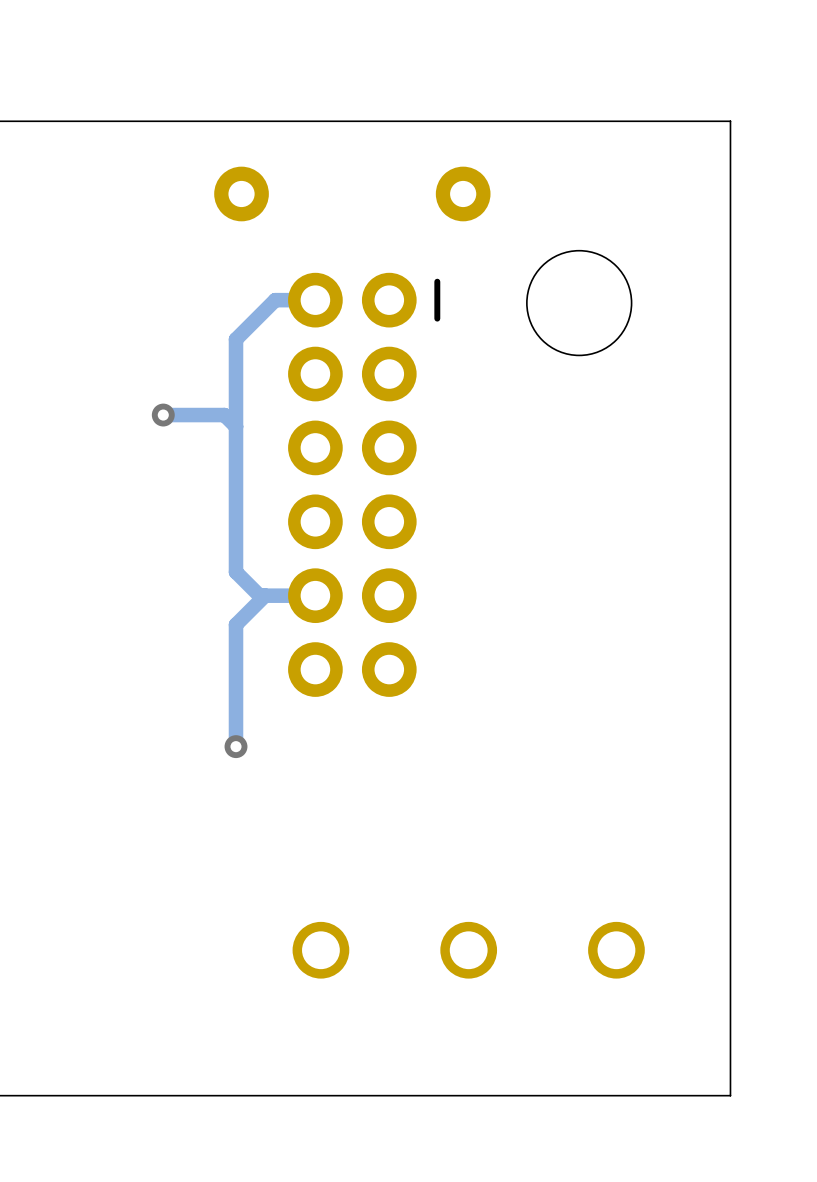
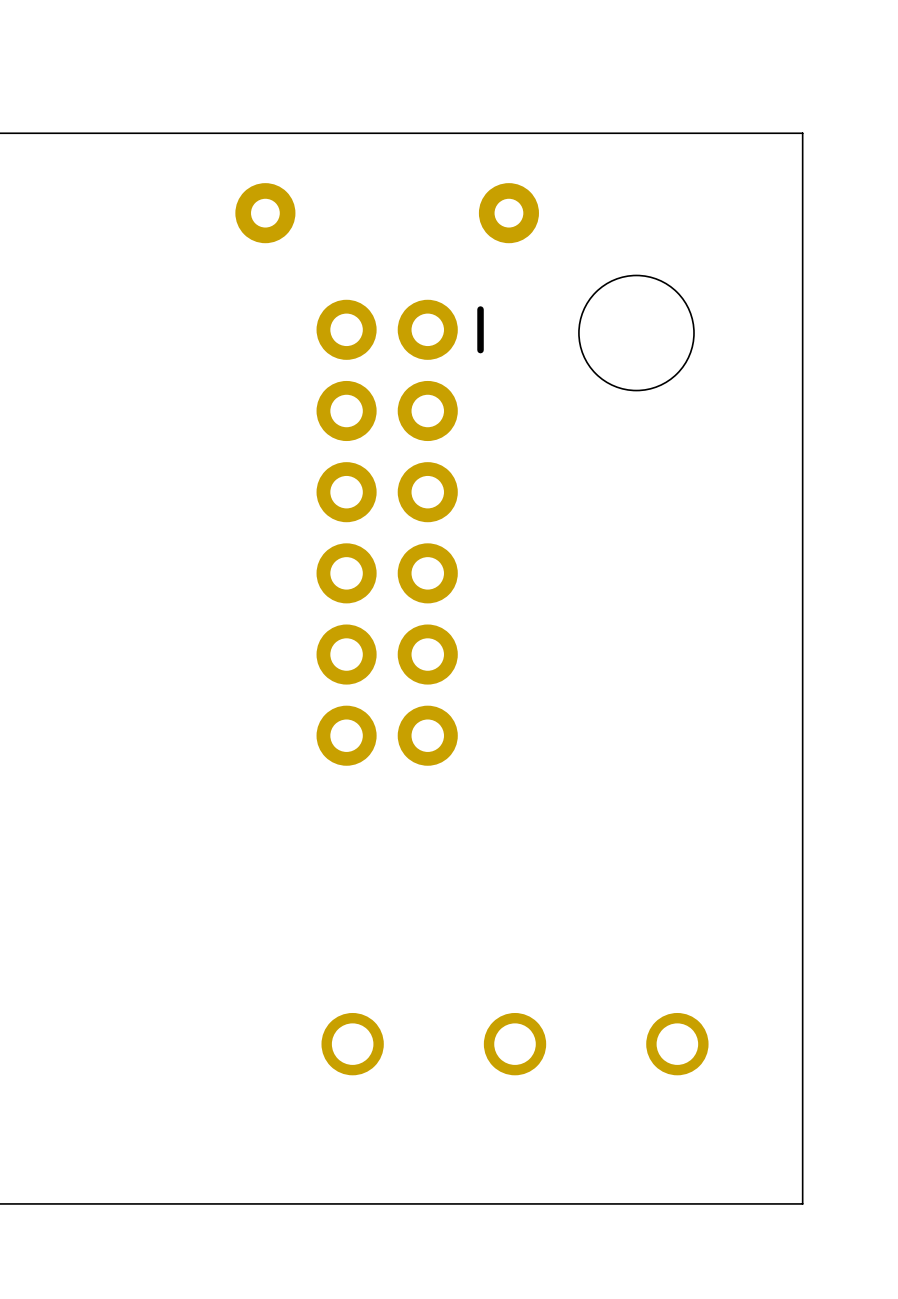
track: (315, 300) (275, 300) (236, 339) (236, 572) (259, 595) (315, 595) -> none
track: (163, 415) (224, 415) (236, 426) -> none
via: (163, 415) -> none
track: (265, 595) (236, 624) (236, 746) -> none
via: (236, 746) -> none

